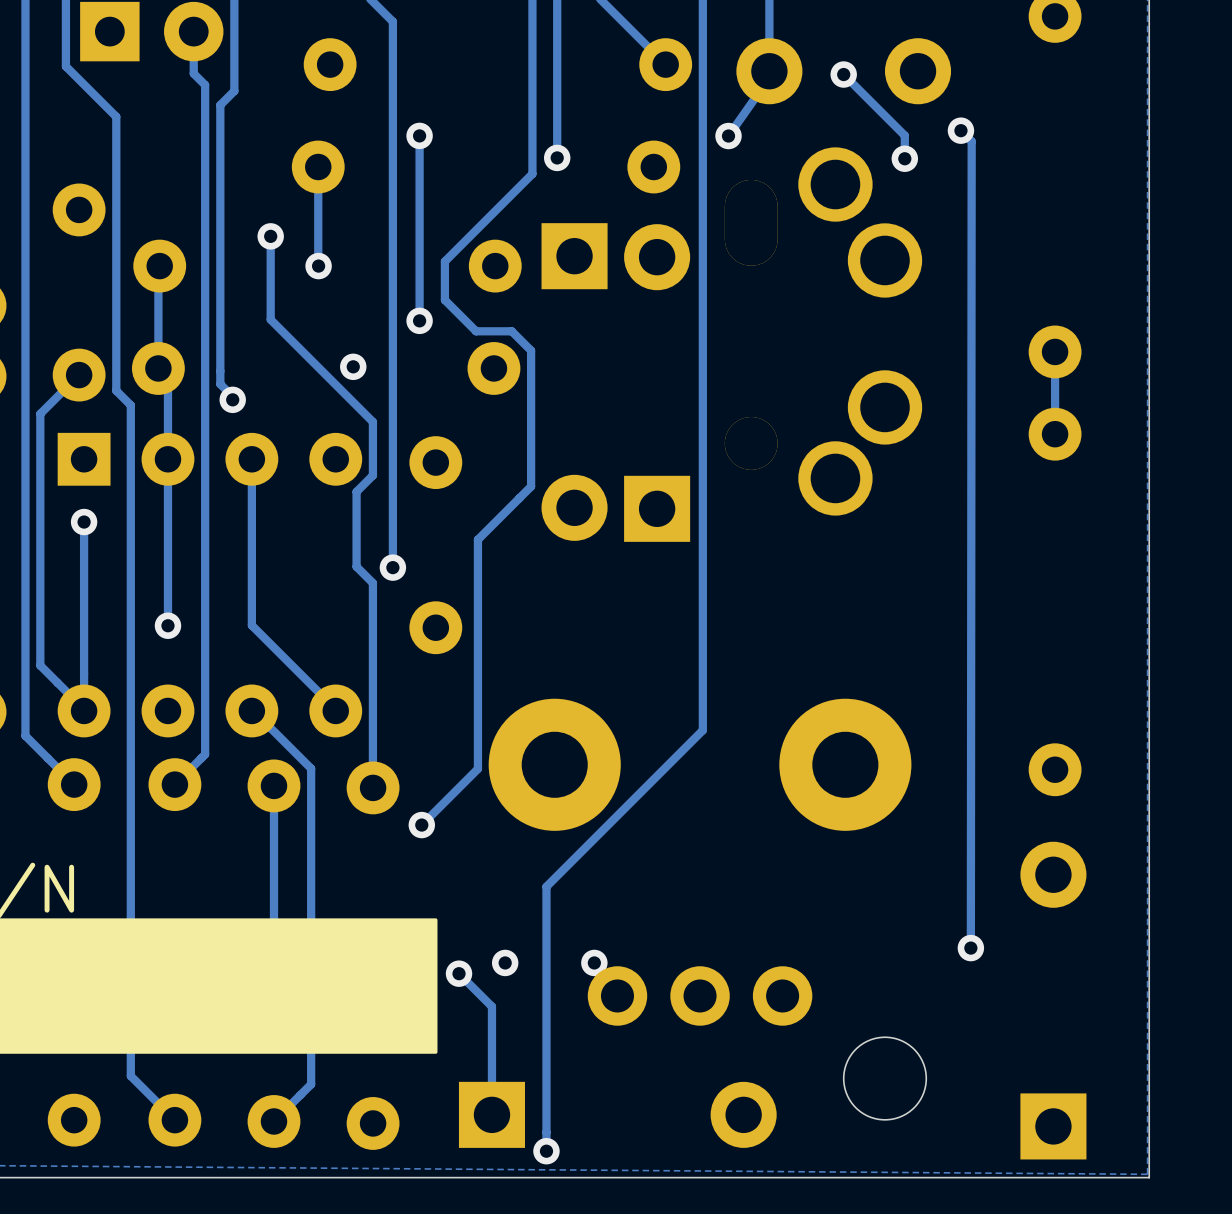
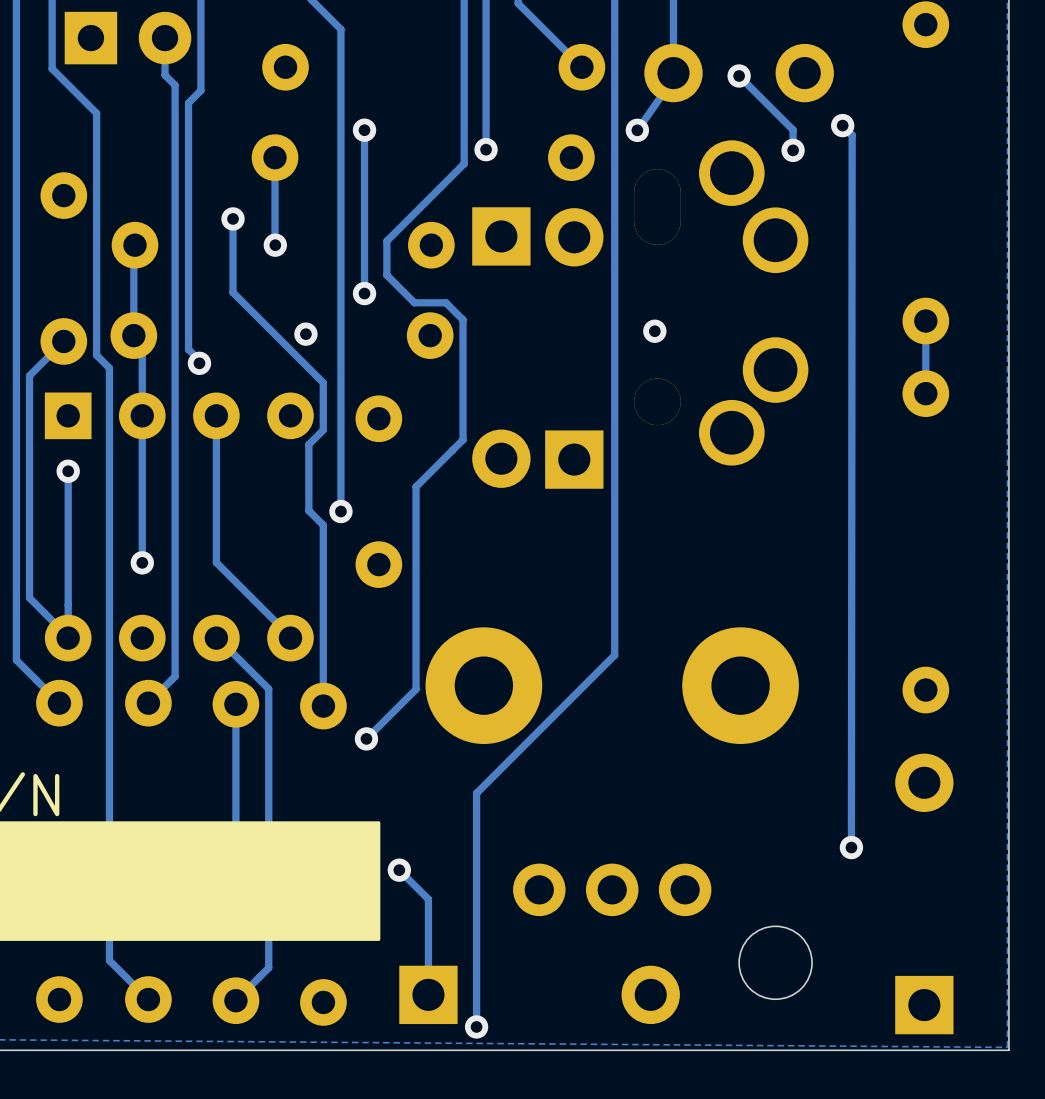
via: none -> (654, 331)
via: (505, 962) -> none
via: (594, 962) -> none

